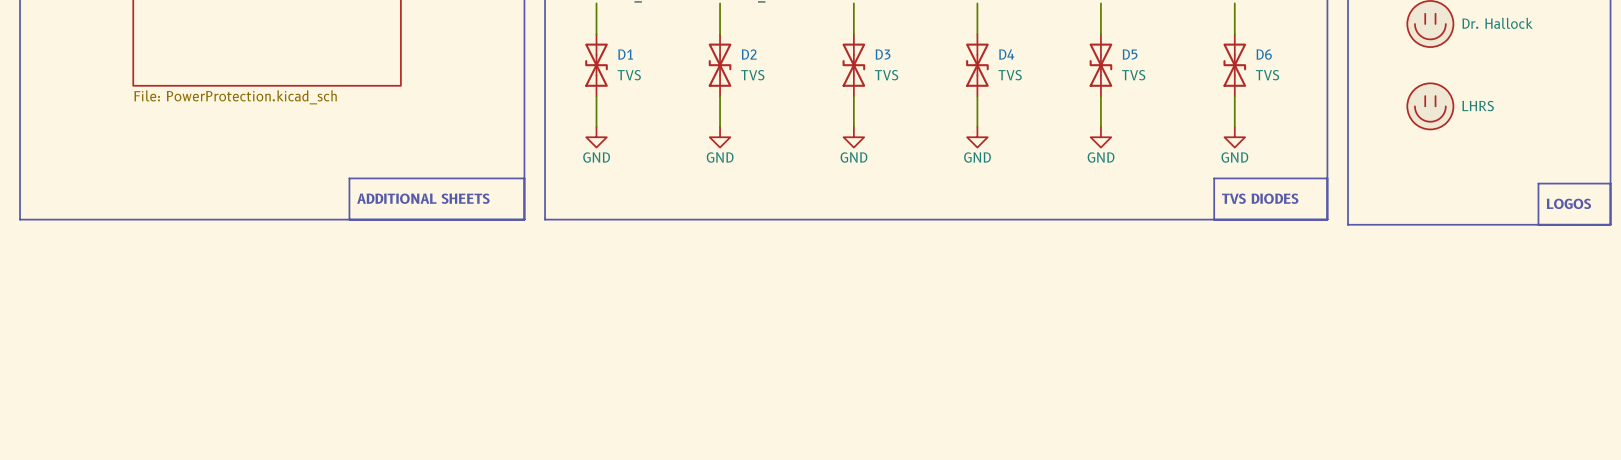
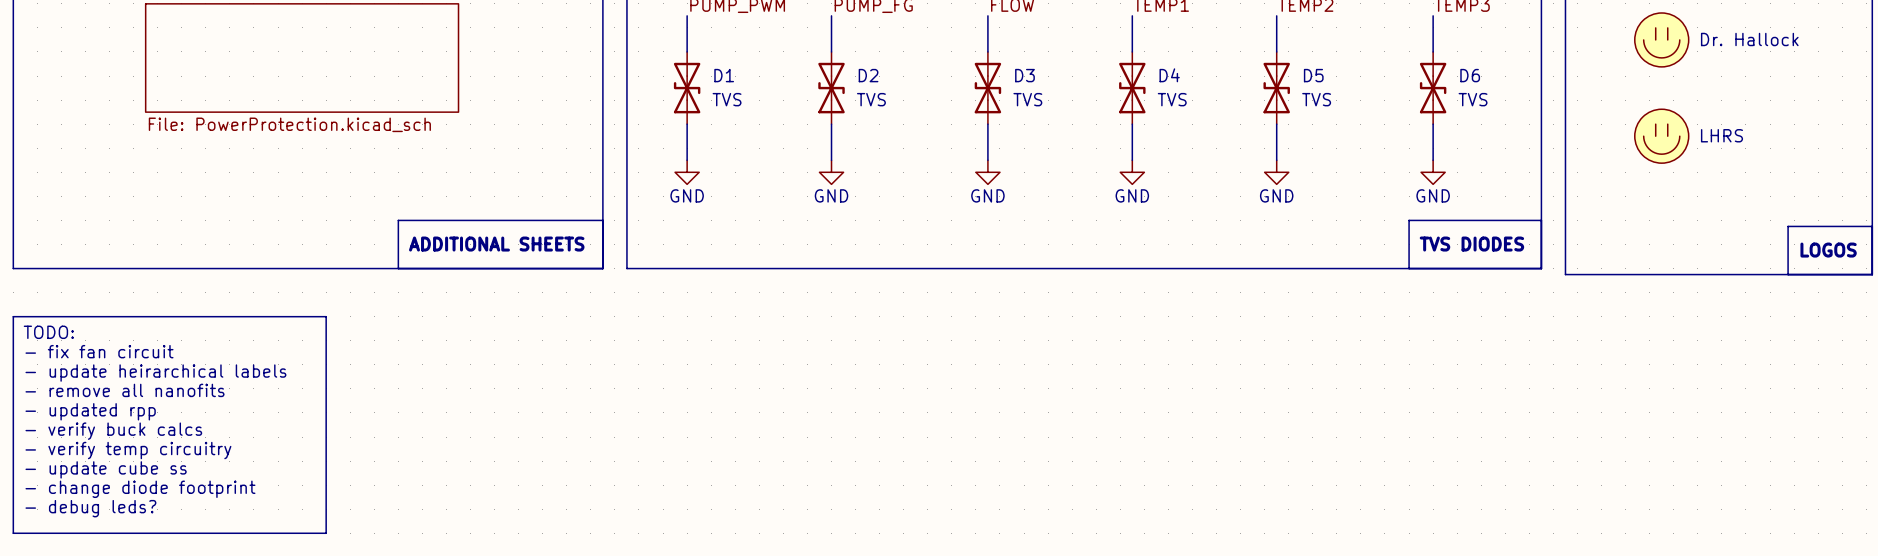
line: none -> (13, 316) (326, 316) (326, 533) (13, 533) (13, 316)
text: none -> TODO: (48, 332)
text: none -> - fix fan circuit (99, 351)
text: none -> - update heirarchical labels (155, 373)
text: none -> - remove all nanofits (124, 390)
text: none -> - updated rpp (90, 411)
text: none -> - verify buck calcs (113, 431)
text: none -> - verify temp circuitry (128, 450)
text: none -> - update cube ss (106, 469)
text: none -> - change diode footprint (140, 489)
text: none -> - debug leds? (90, 508)

